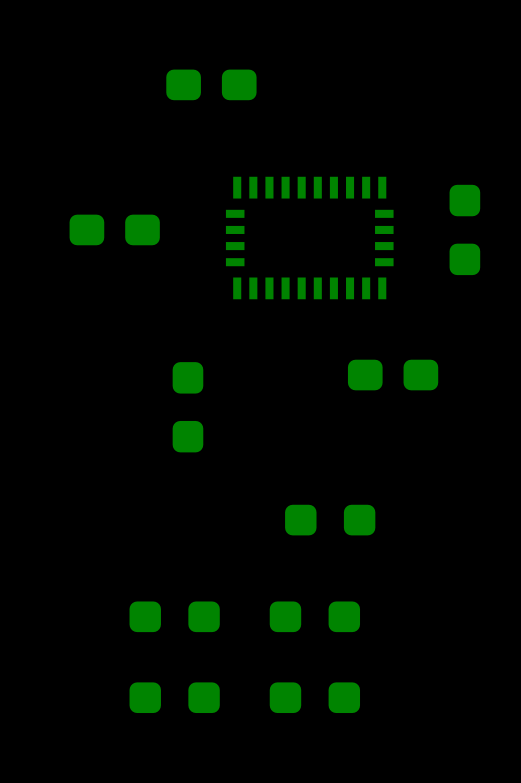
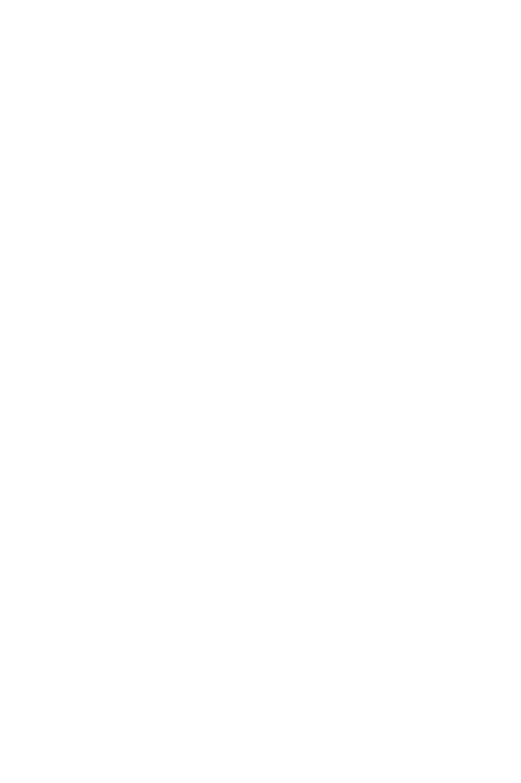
part: (211, 84) -> none
part: (114, 229) -> none
part: (464, 229) -> none
part: (309, 238) -> none
part: (393, 375) -> none
part: (187, 407) -> none
part: (330, 520) -> none
part: (174, 616) -> none
part: (314, 616) -> none
part: (174, 697) -> none
part: (314, 697) -> none

